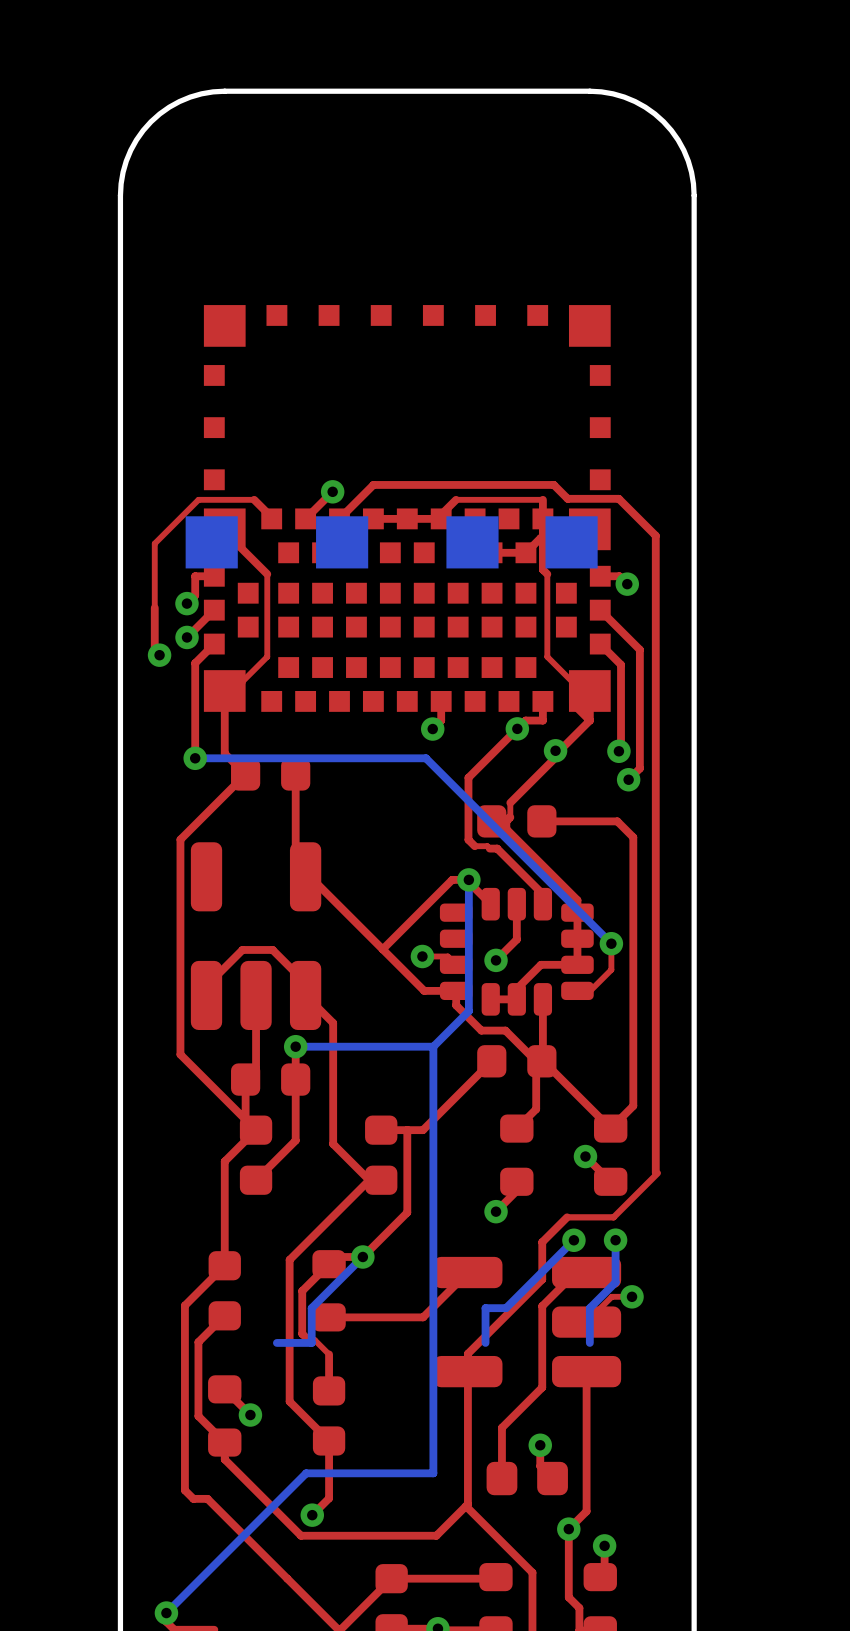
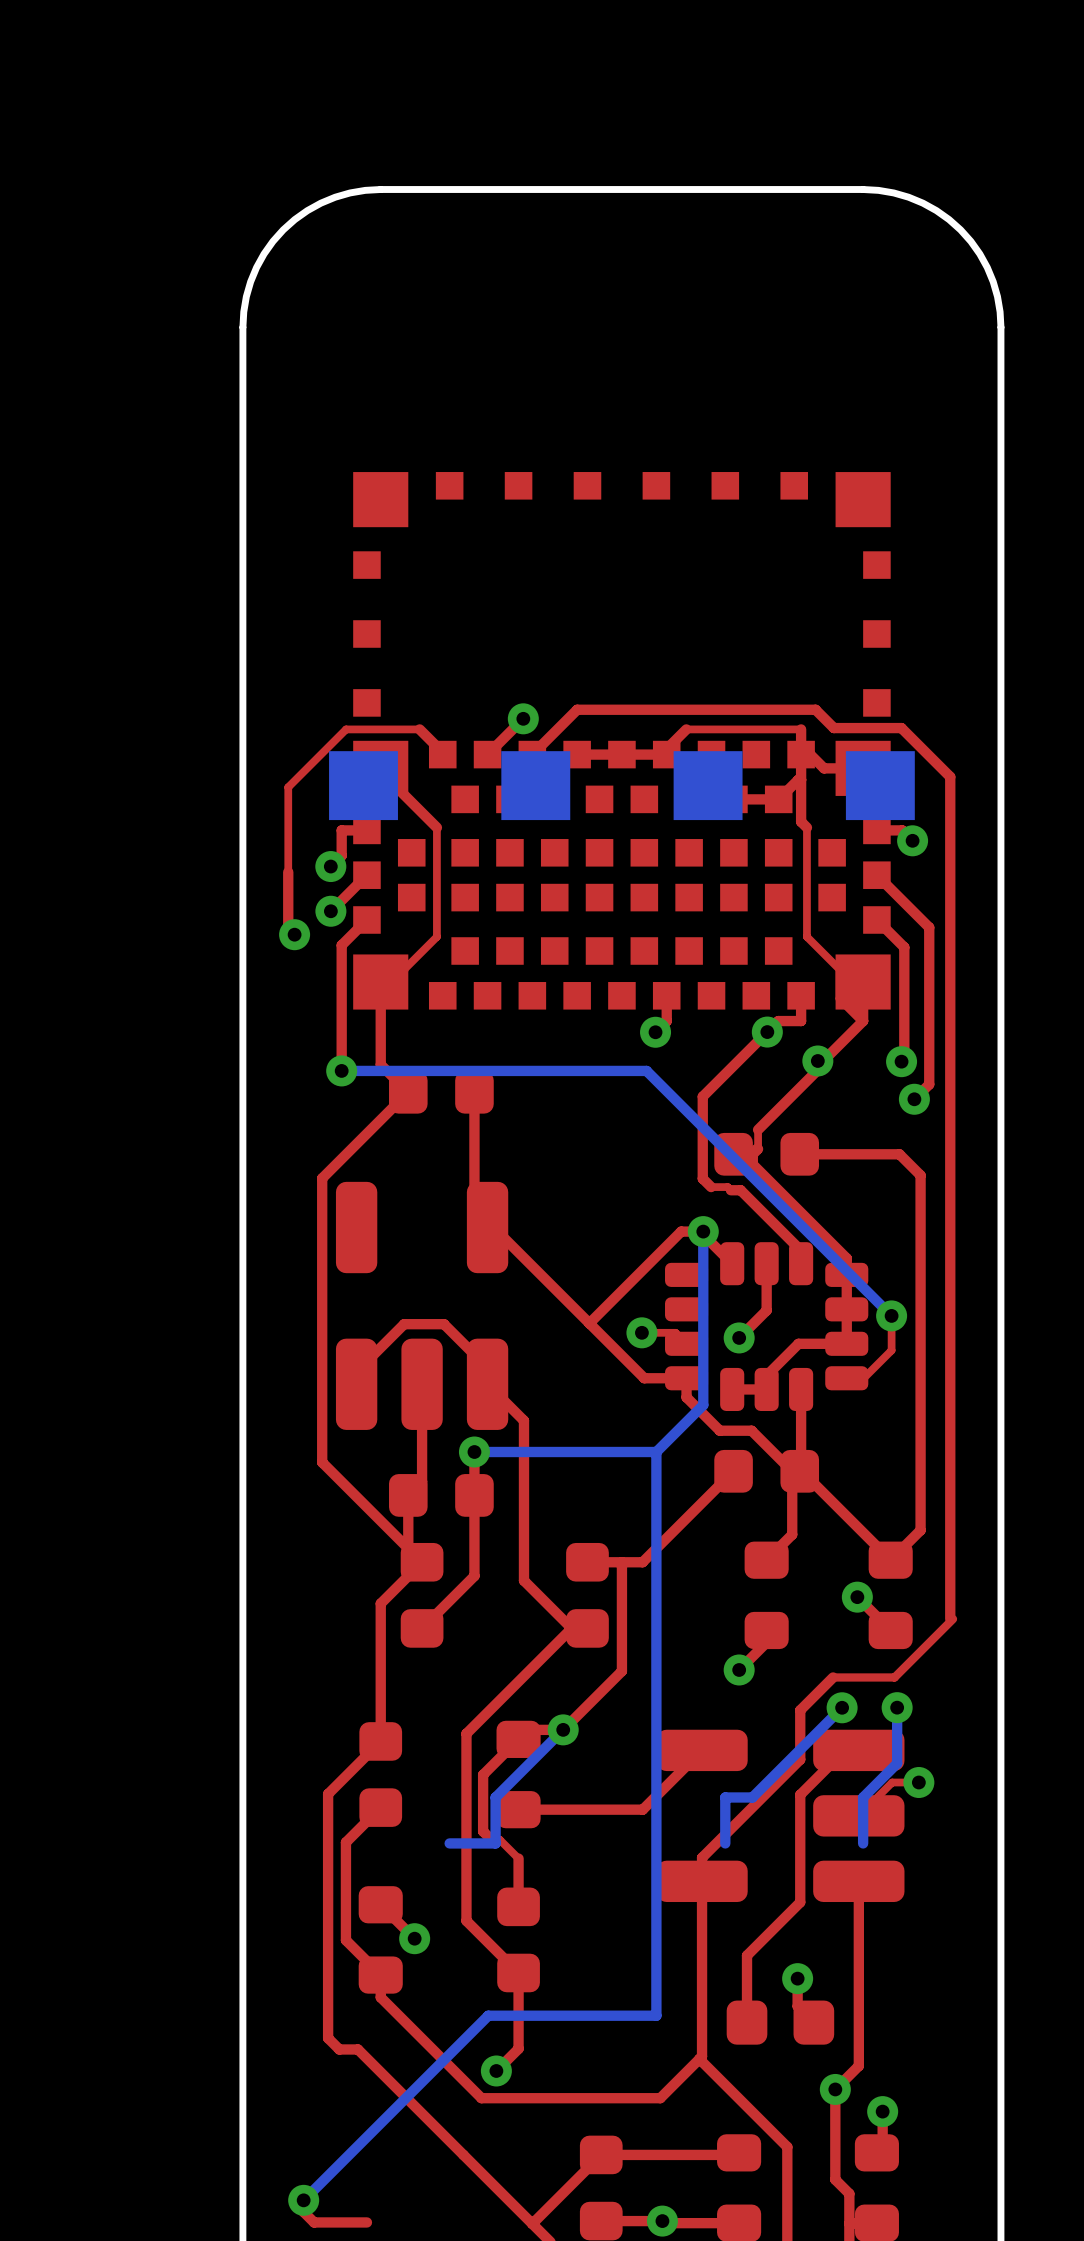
part position: (571, 542) -> (880, 785)

